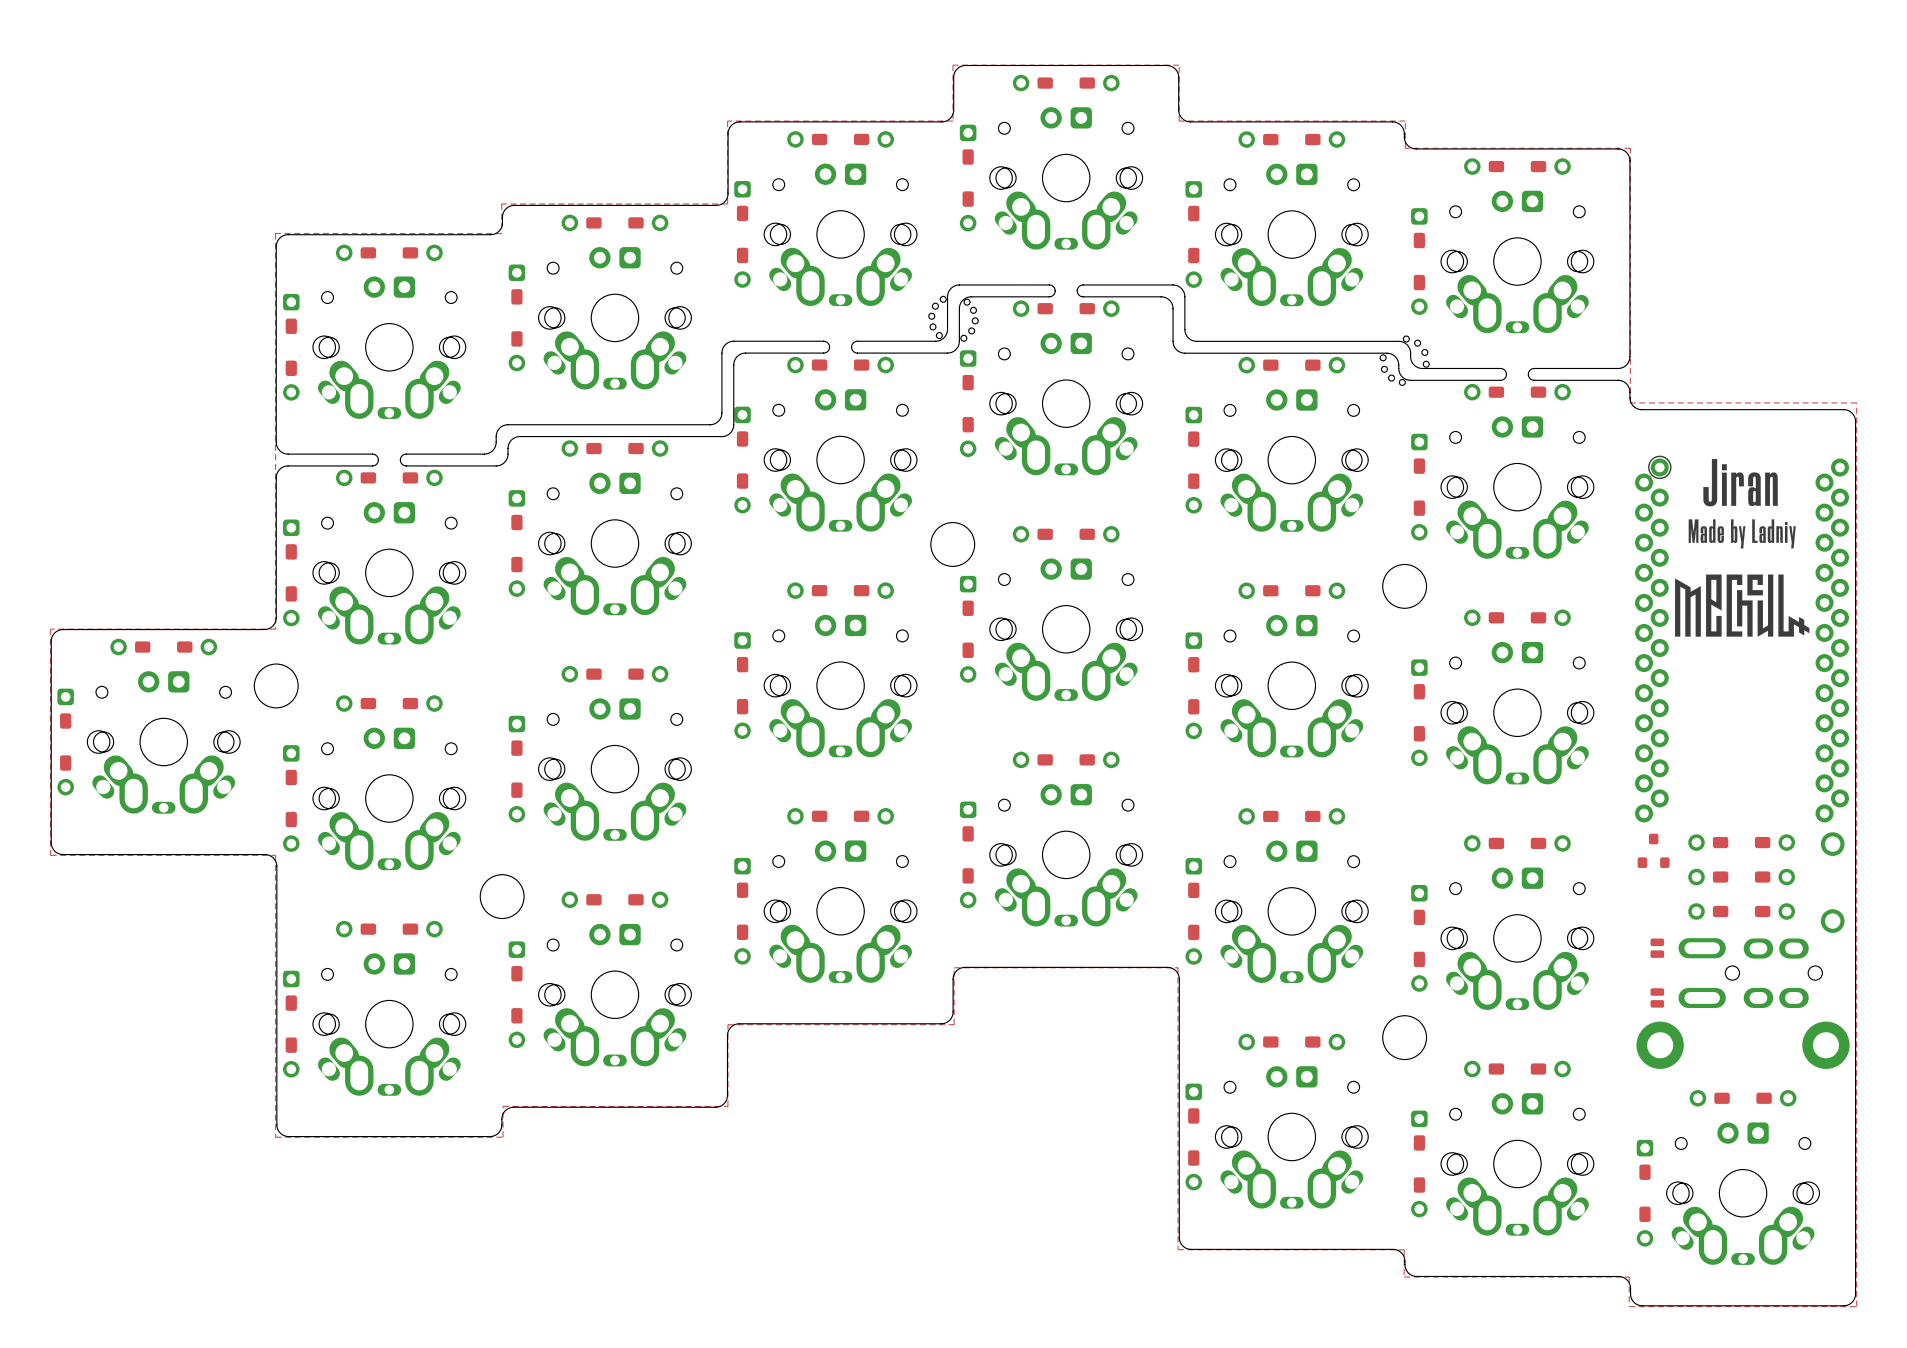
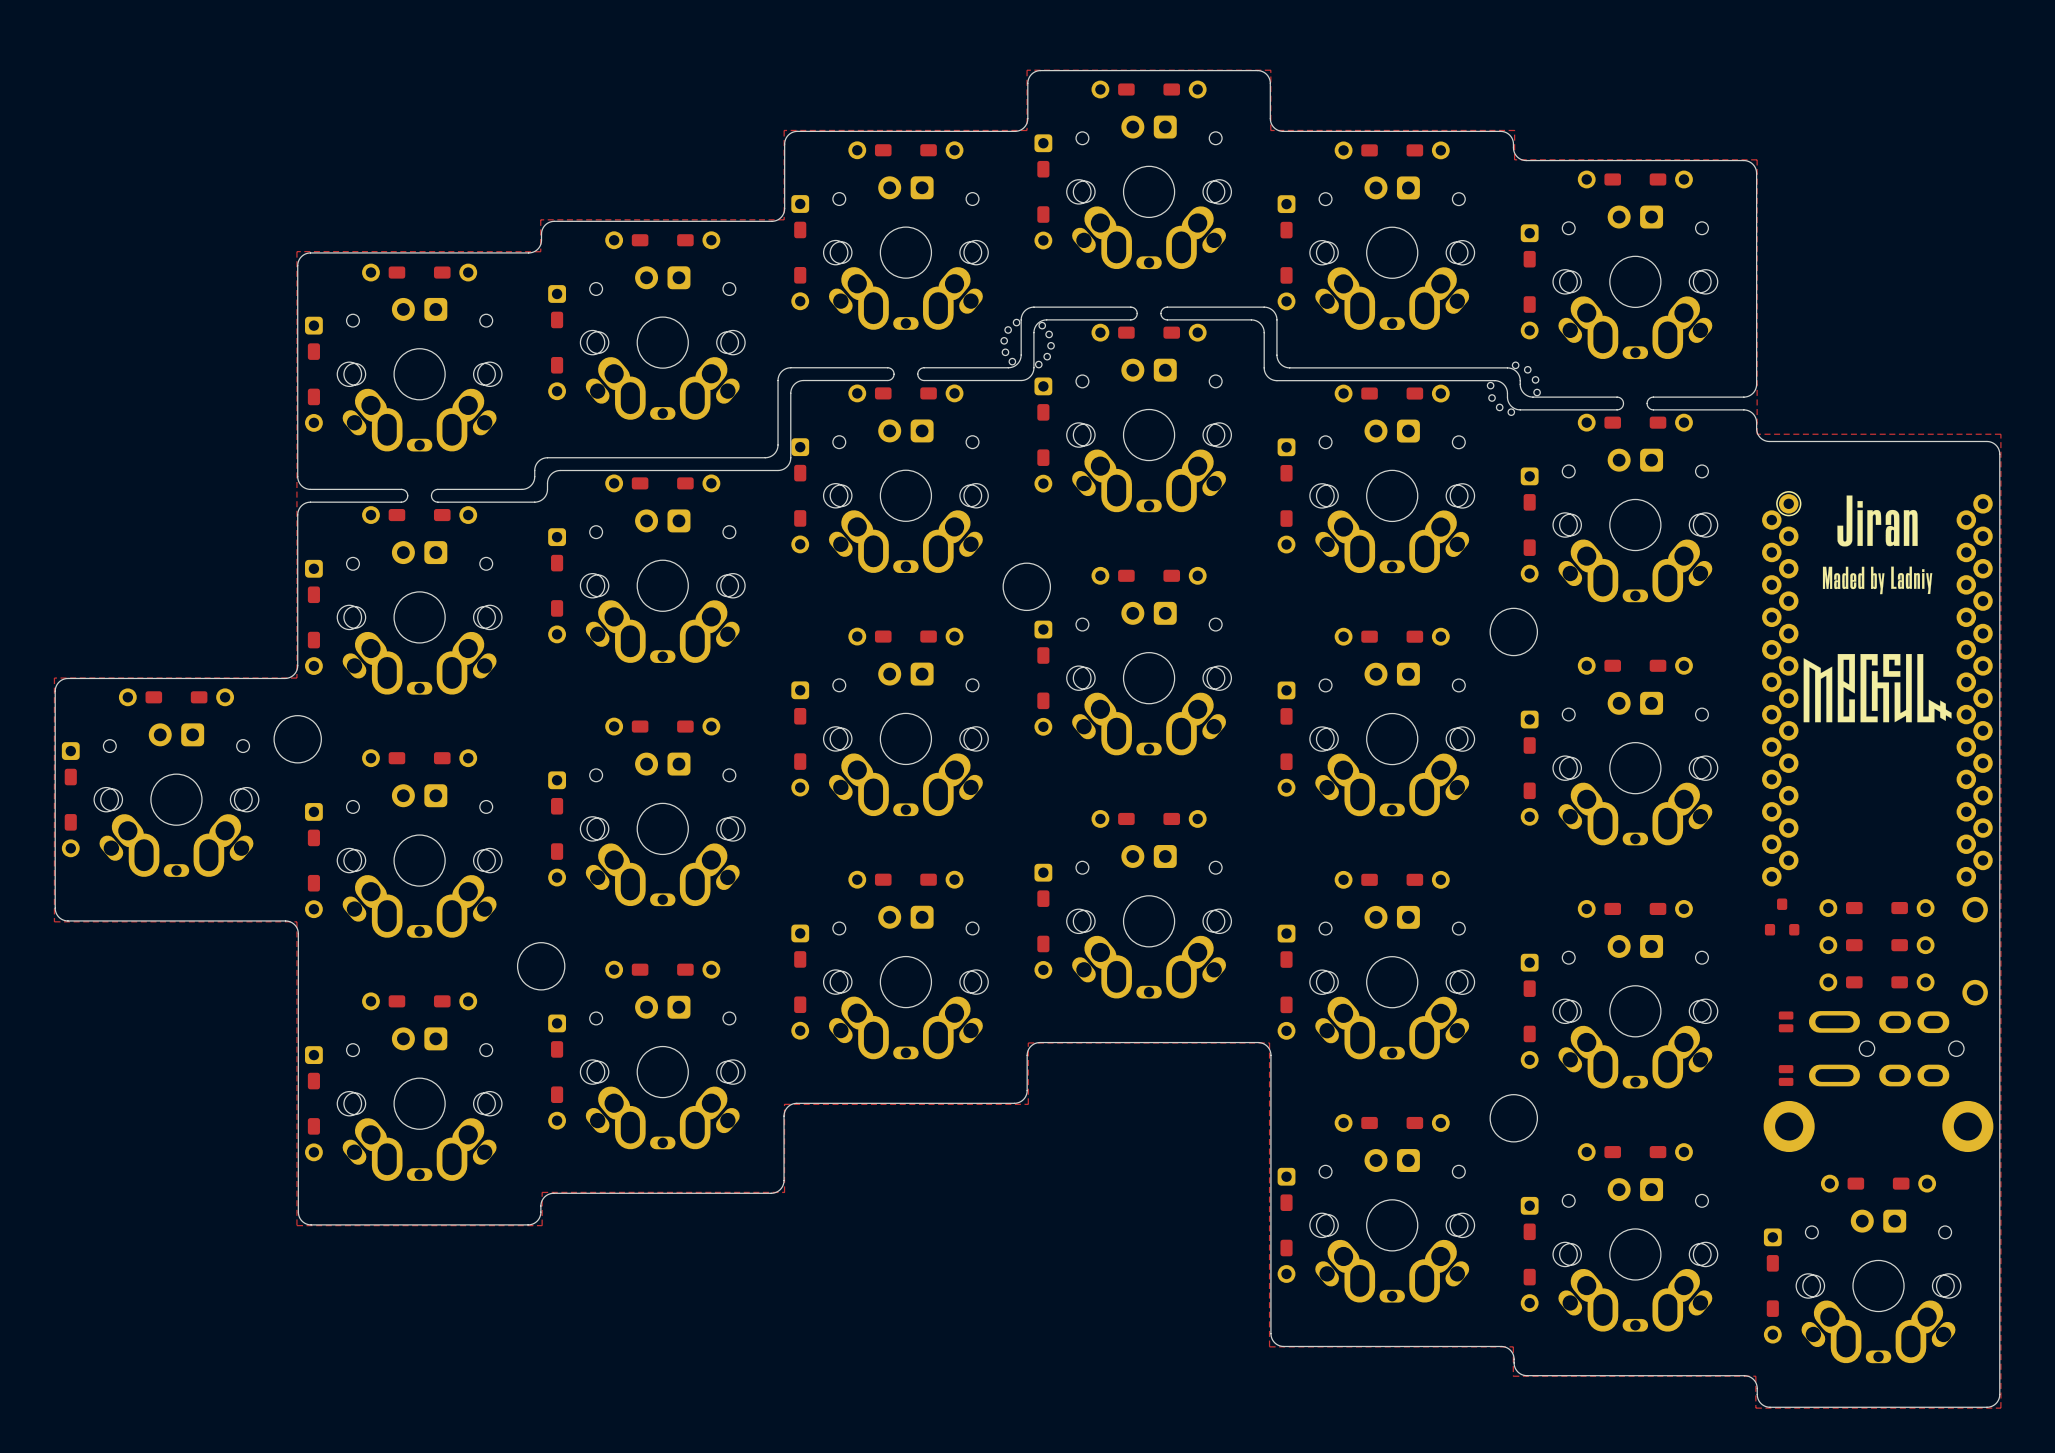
drawing: none -> [1803, 495, 1952, 723]
drawing: [1675, 459, 1810, 637] -> none

